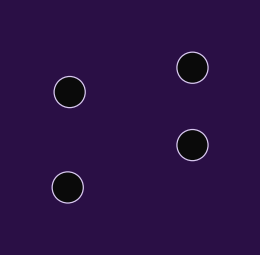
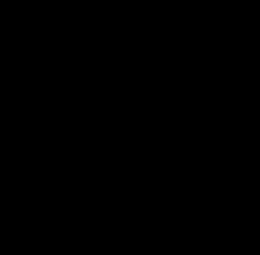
part: (192, 67) -> none
part: (69, 92) -> none
part: (192, 145) -> none
part: (67, 187) -> none

